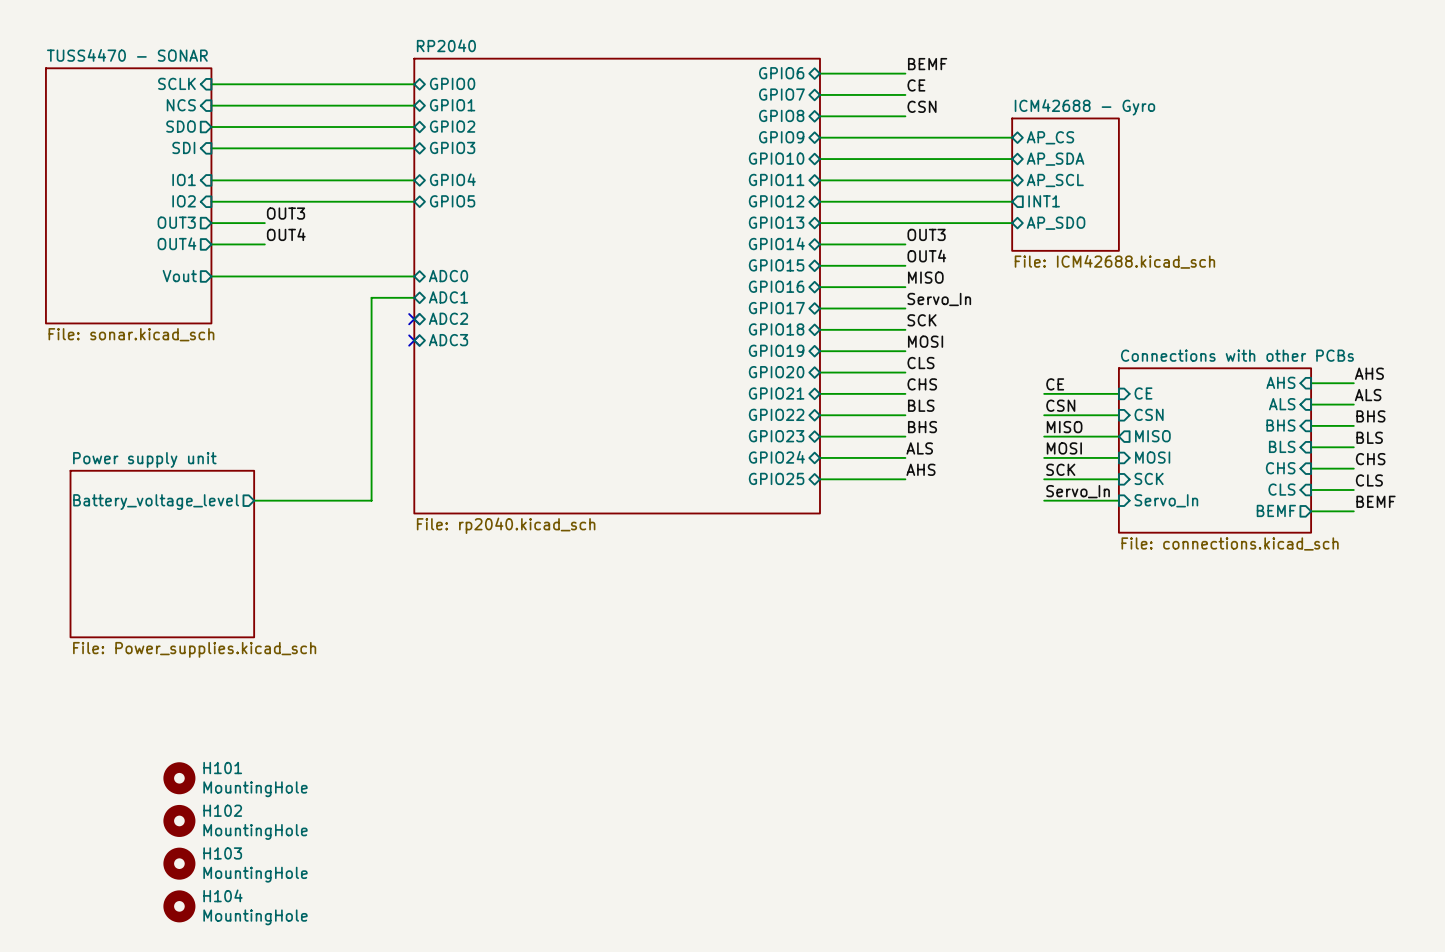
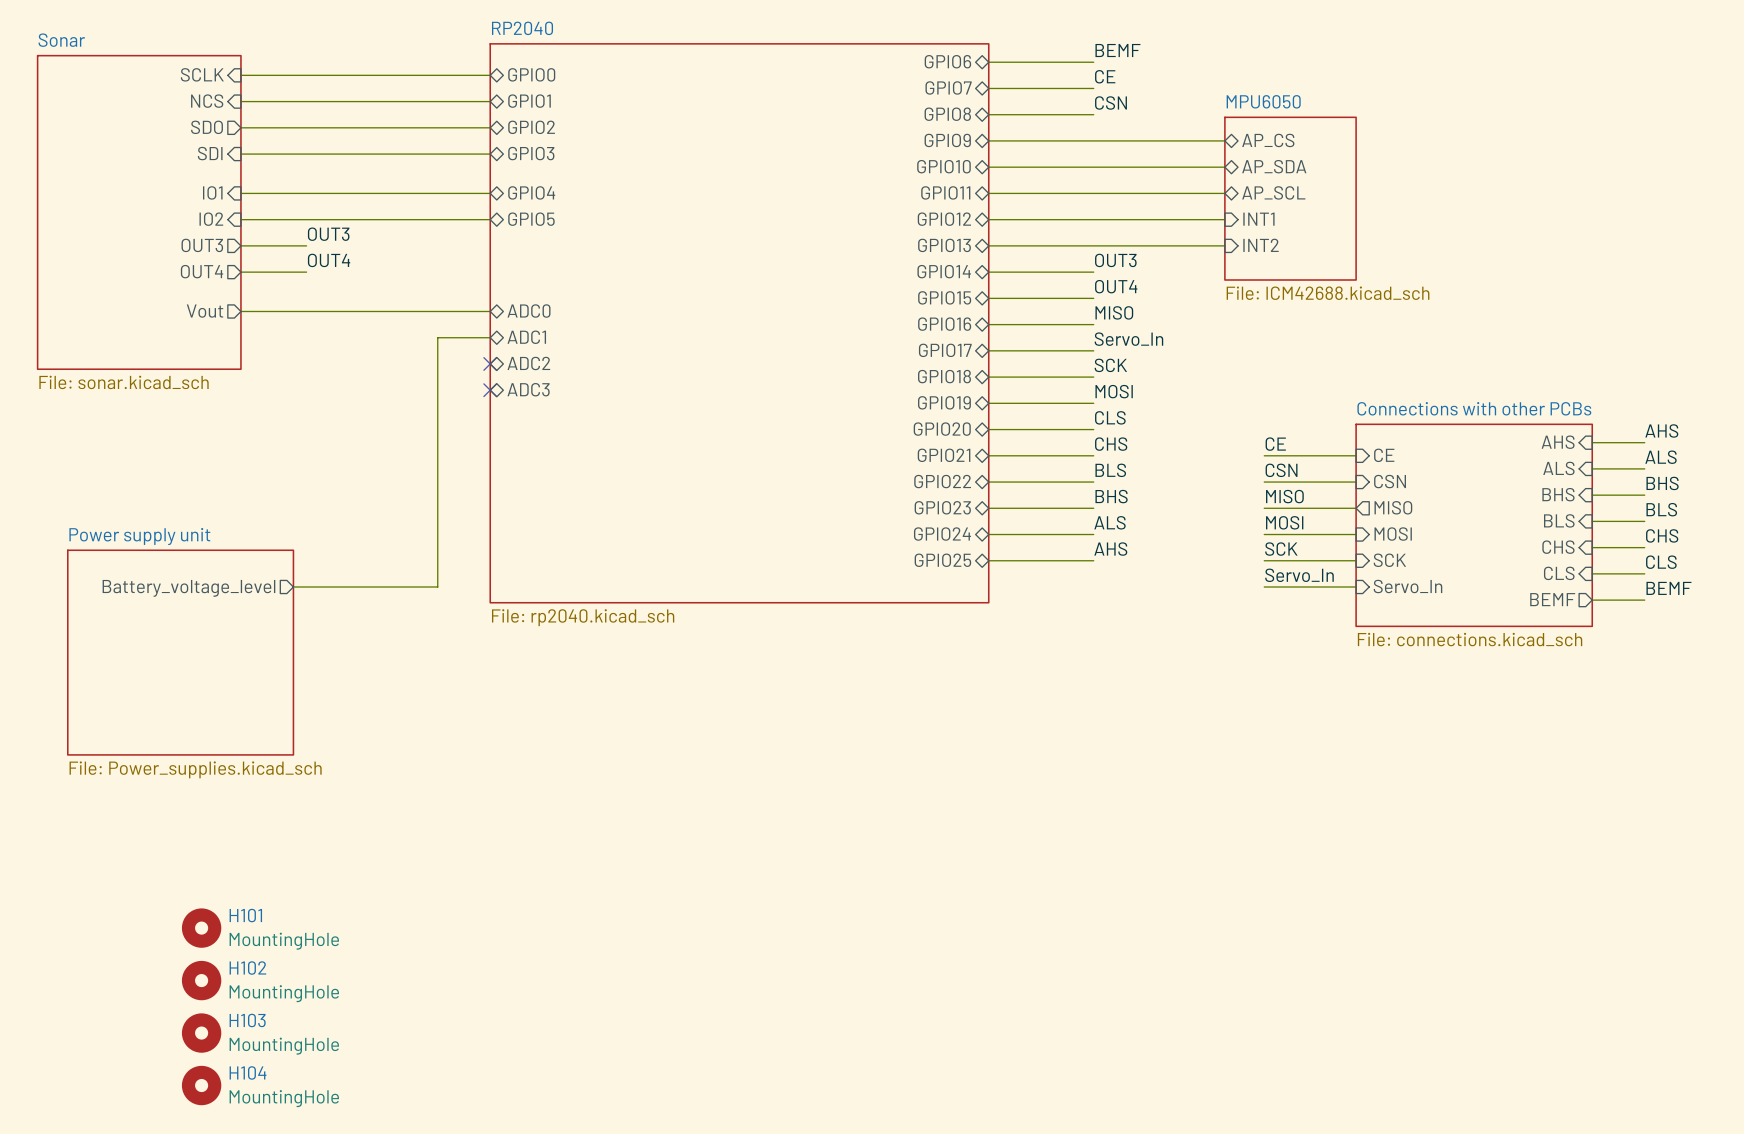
sheet TUSS4470 - SONAR name: TUSS4470 - SONAR (127, 55) -> Sonar (61, 40)
sheet ICM42688 - Gyro name: ICM42688 - Gyro (1084, 107) -> MPU6050 (1263, 101)
sheet pin shape: output (1044, 201) -> input (1258, 219)
sheet pin shape: bidirectional (1056, 223) -> input (1261, 245)
sheet pin: AP_SDO (1056, 223) -> INT2 (1261, 245)

